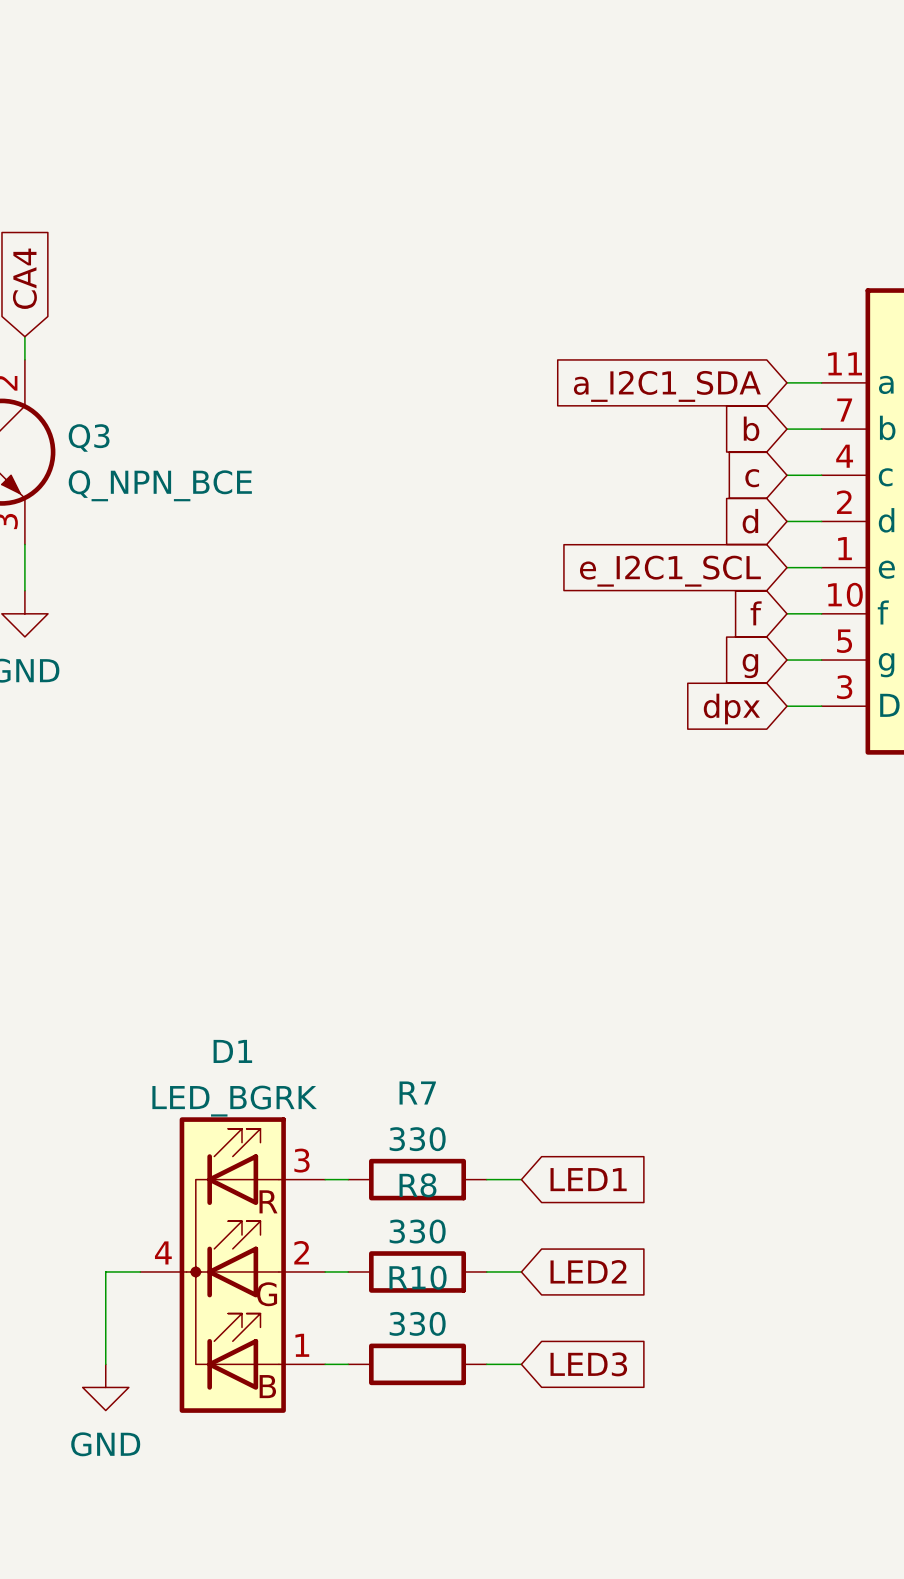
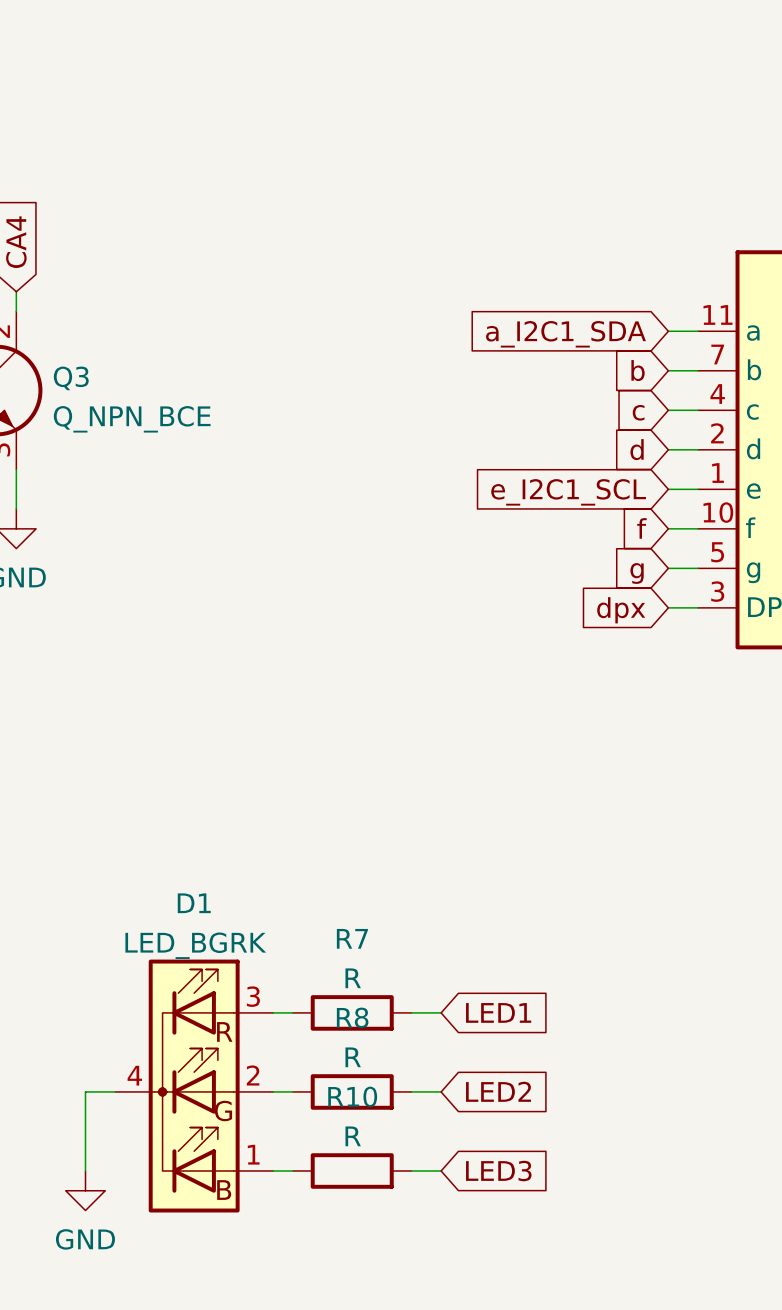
R7 value: 330 (417, 1139) -> R (353, 978)
R8 value: 330 (417, 1231) -> R (353, 1057)
R10 value: 330 (417, 1323) -> R (353, 1136)

